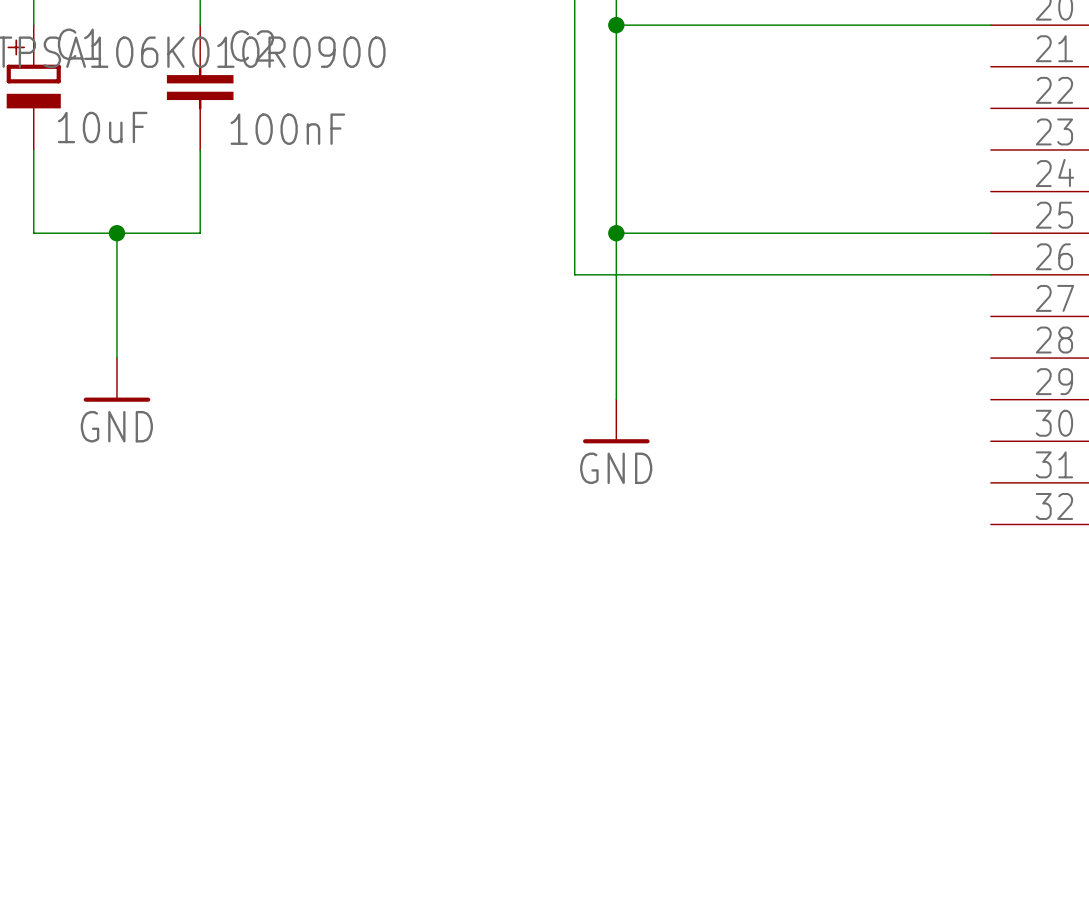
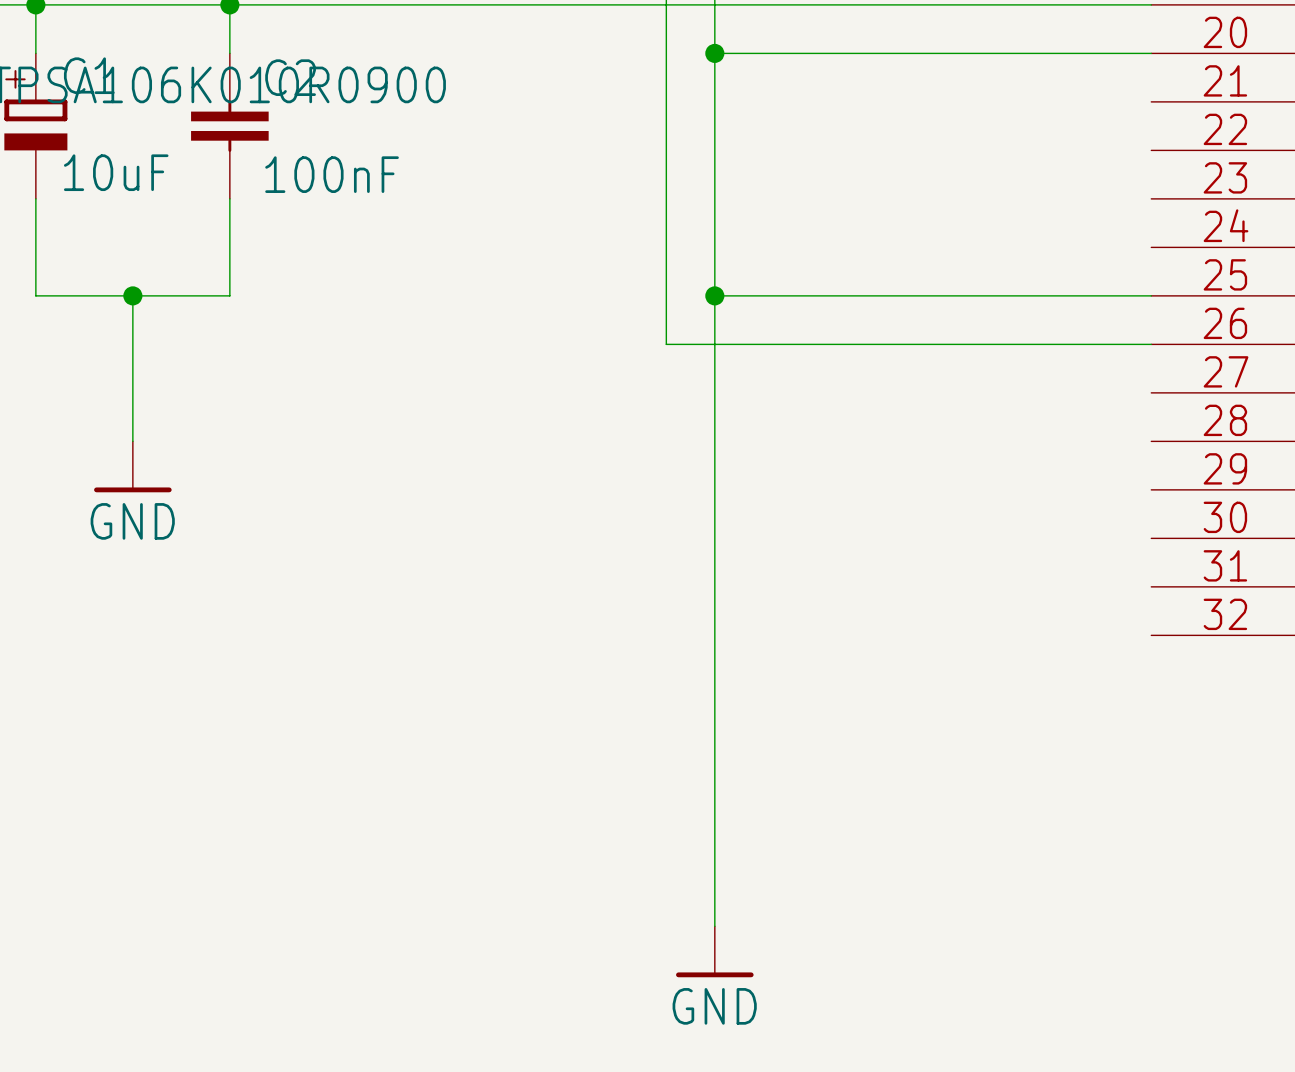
wire: none -> (714, 489) (714, 926)
power symbol position: GND (616, 421) -> GND (714, 951)

